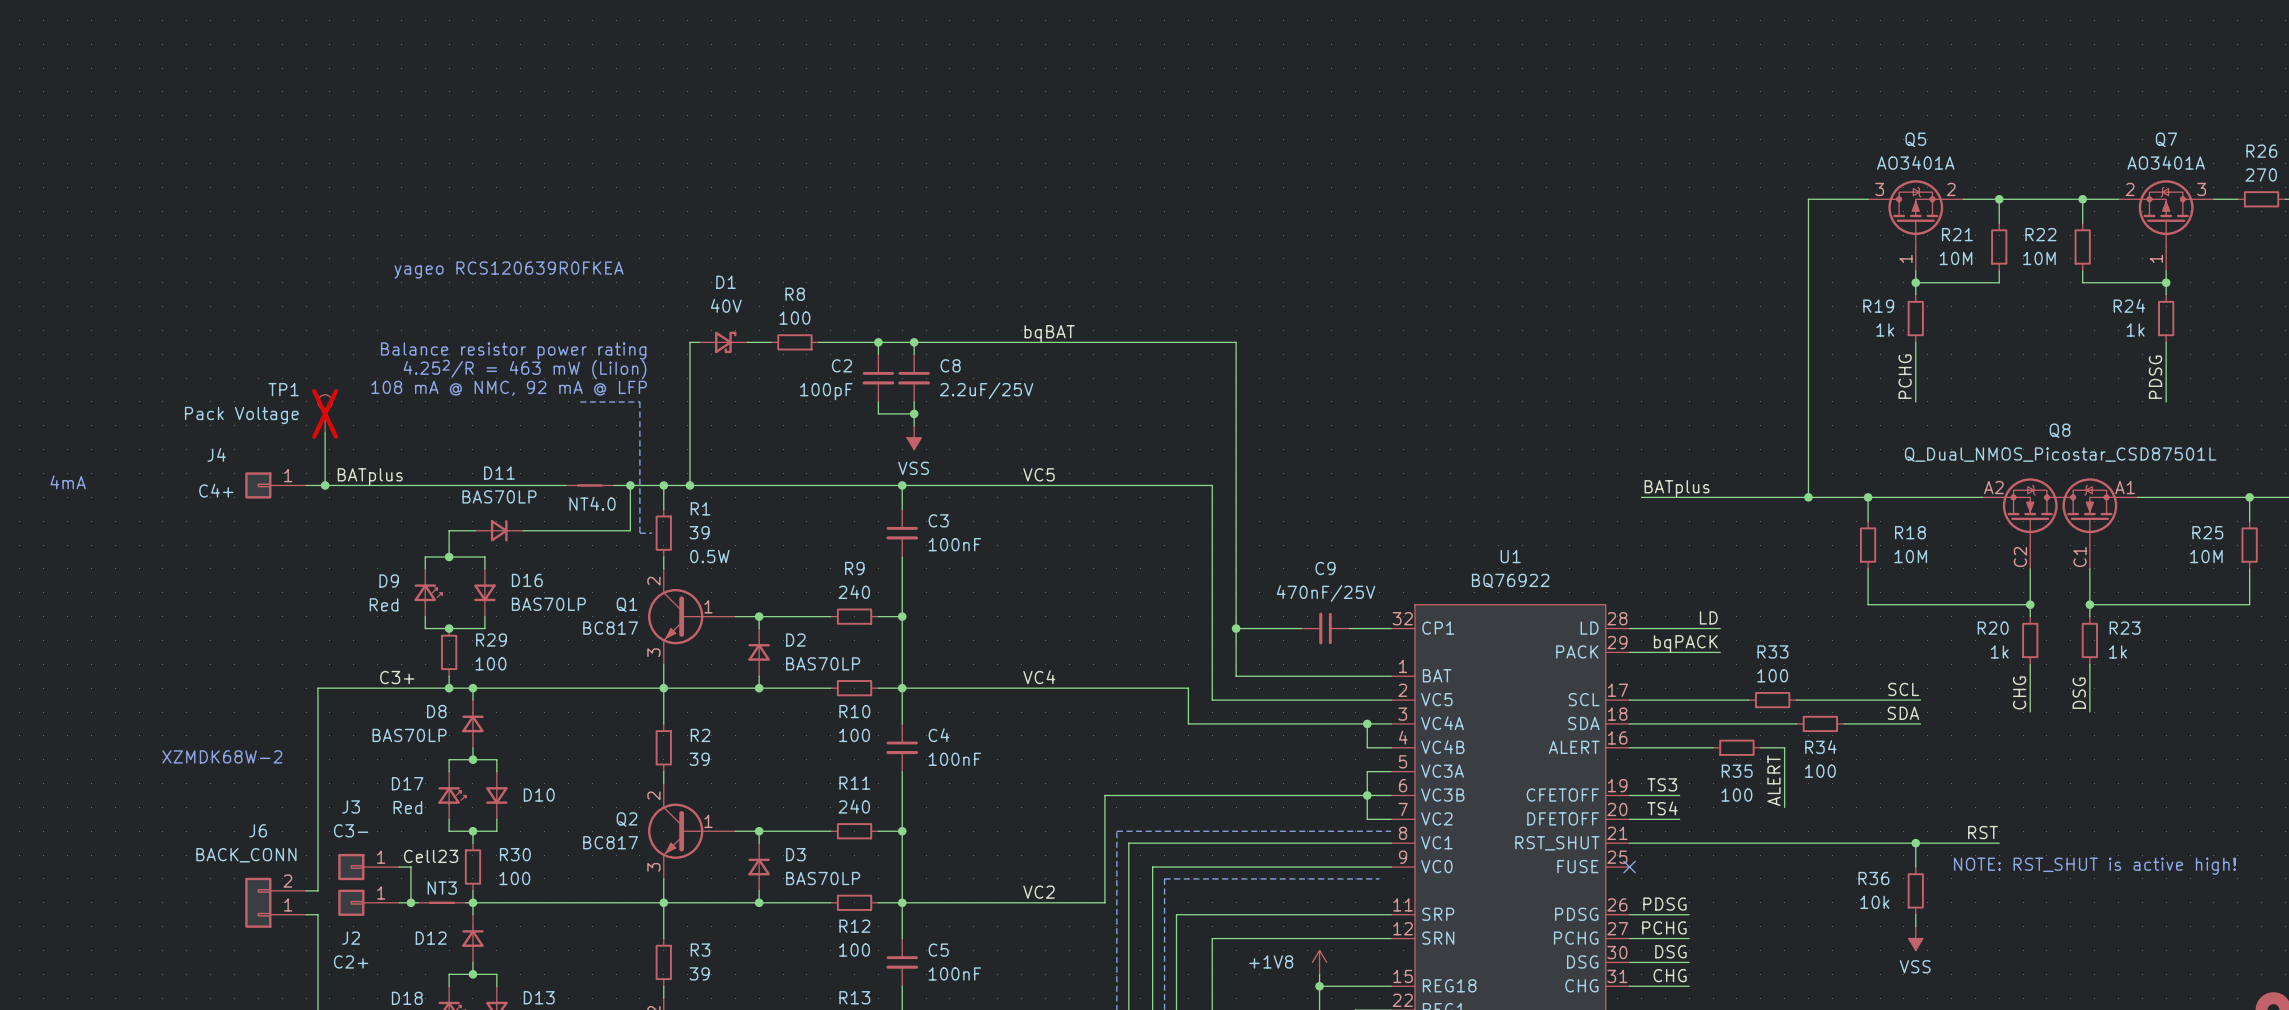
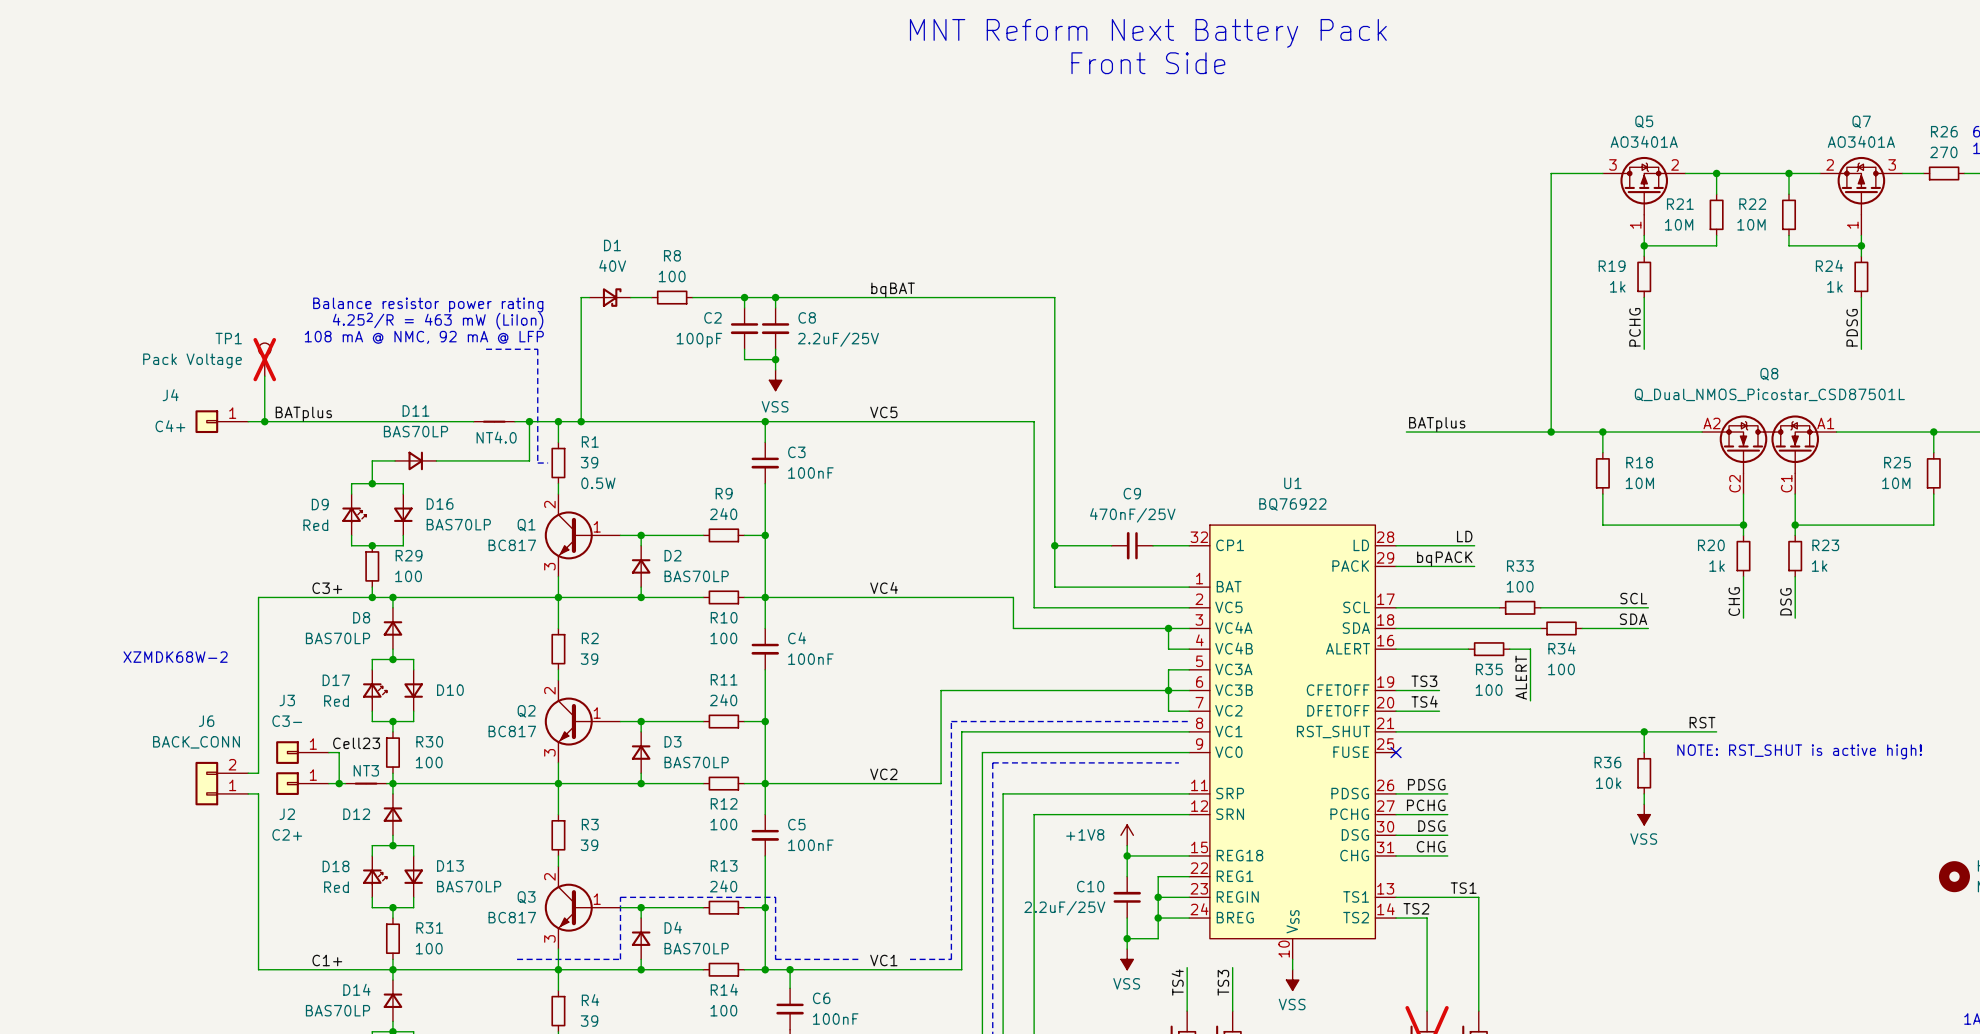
text: none -> MNT Reform Next Battery Pack (1148, 33)
text: none -> Front Side (1148, 63)
text: yageo RCS120639R0FKEA (509, 270) -> none
text: 4mA (68, 482) -> none

